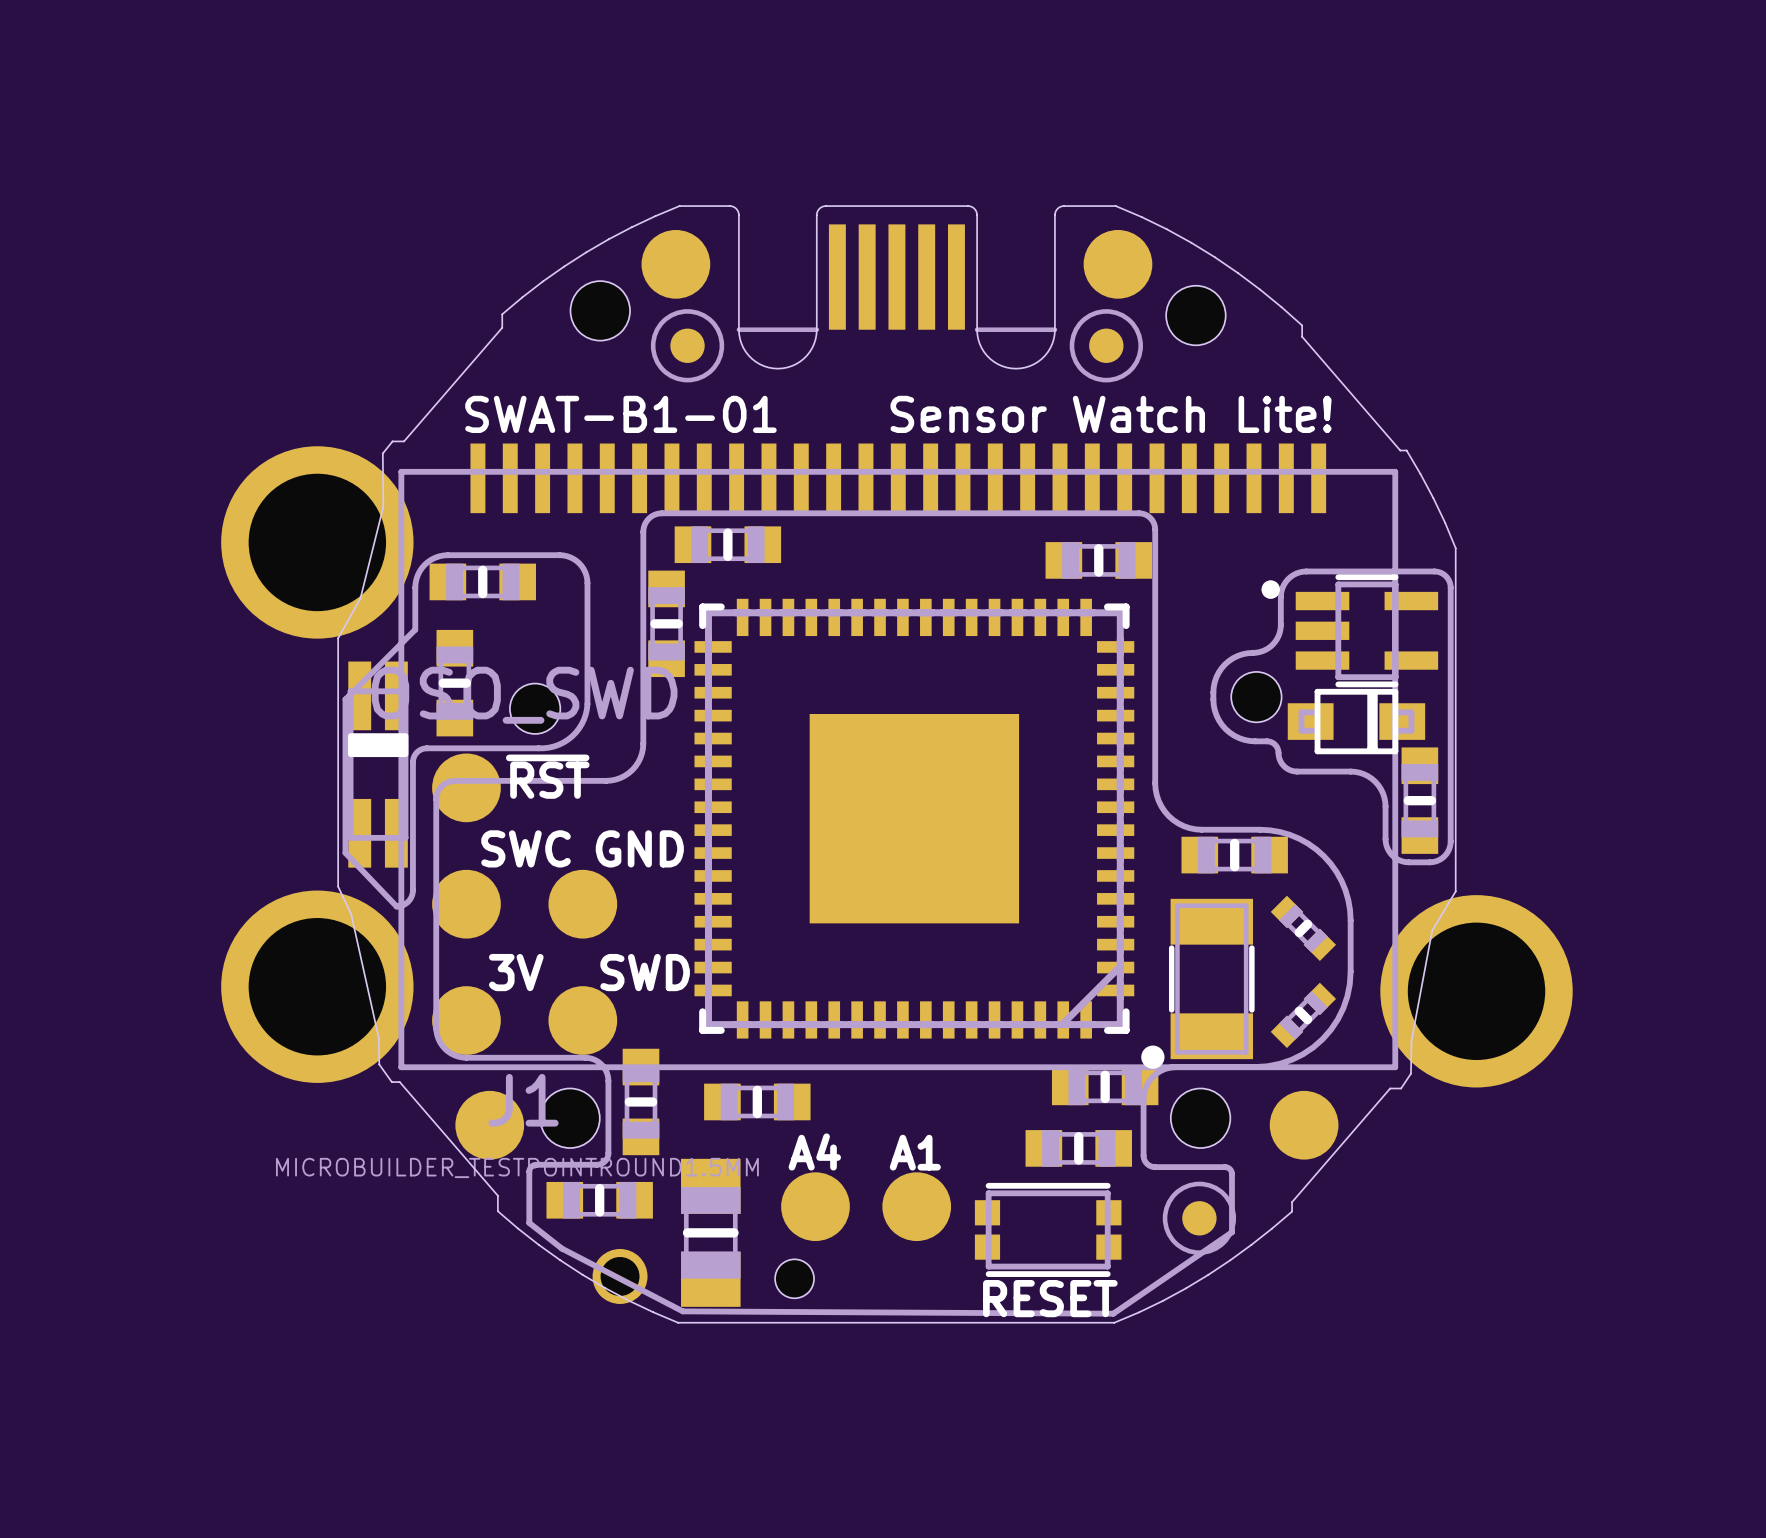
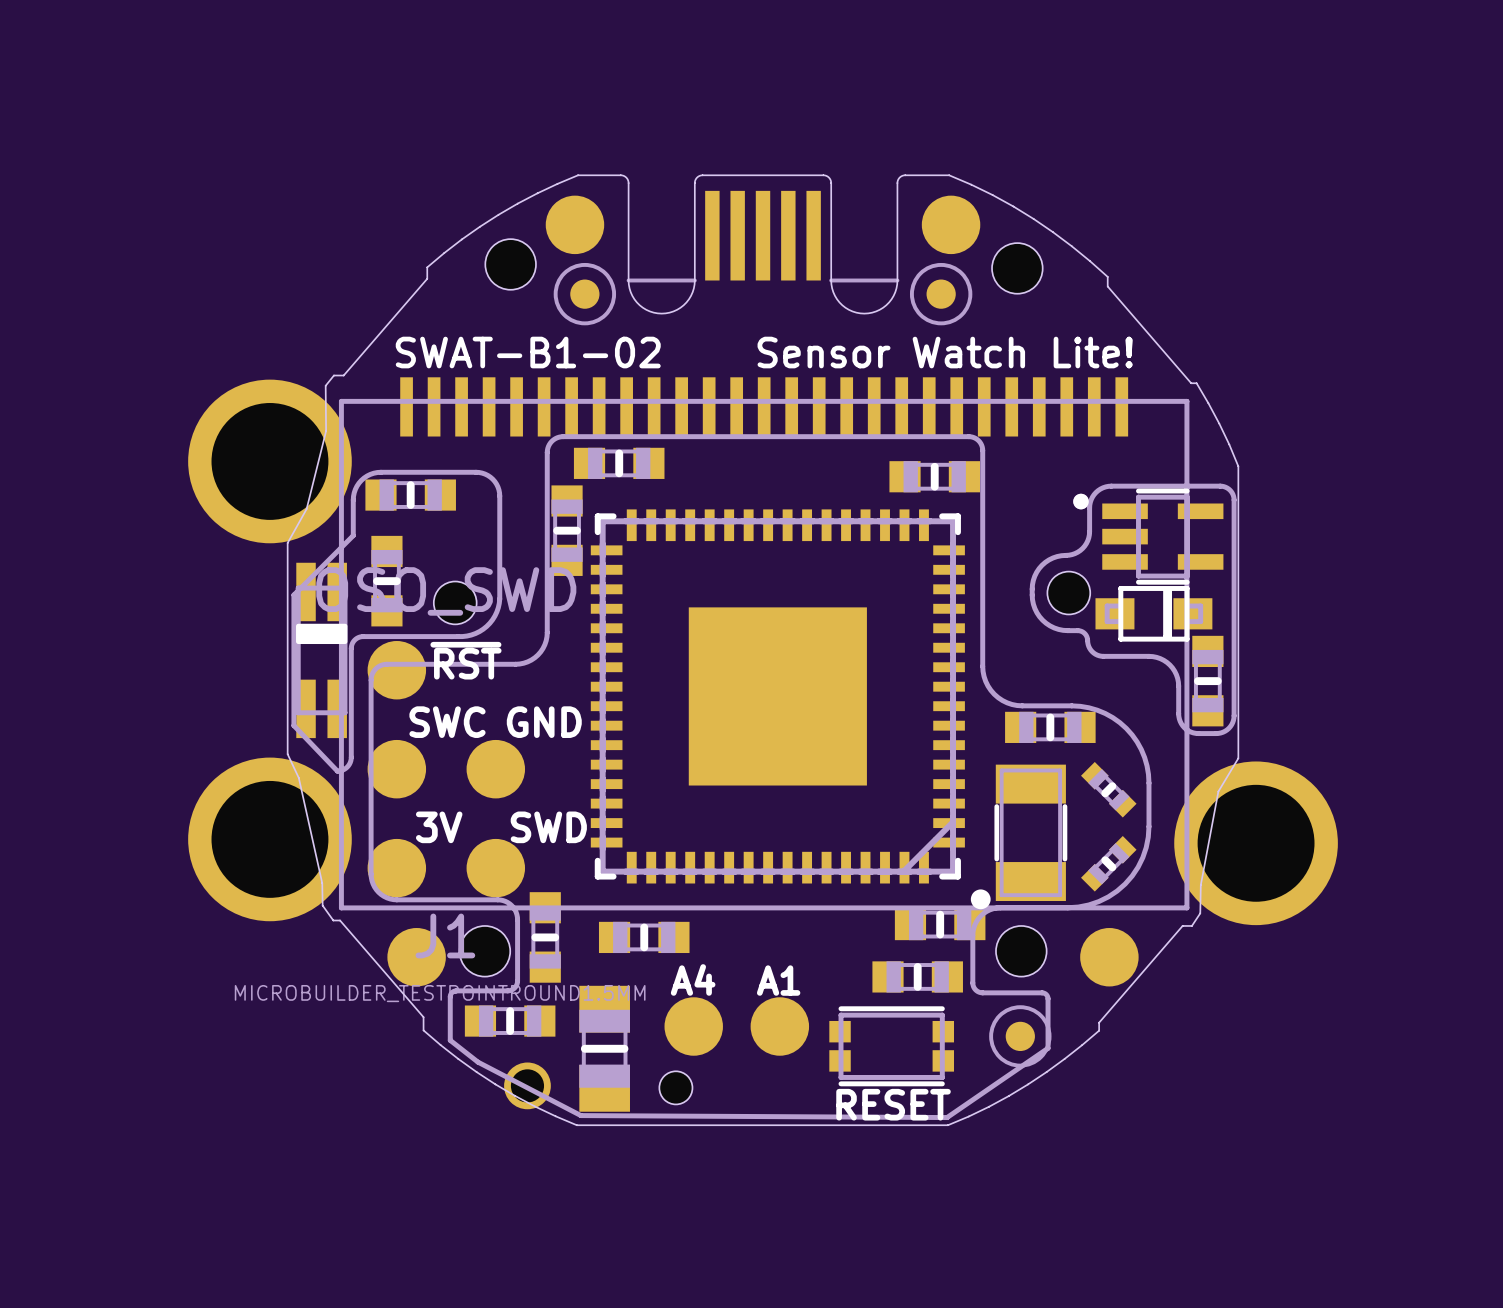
text: SWAT-B1-01 (620, 414) -> SWAT-B1-02 (528, 352)

